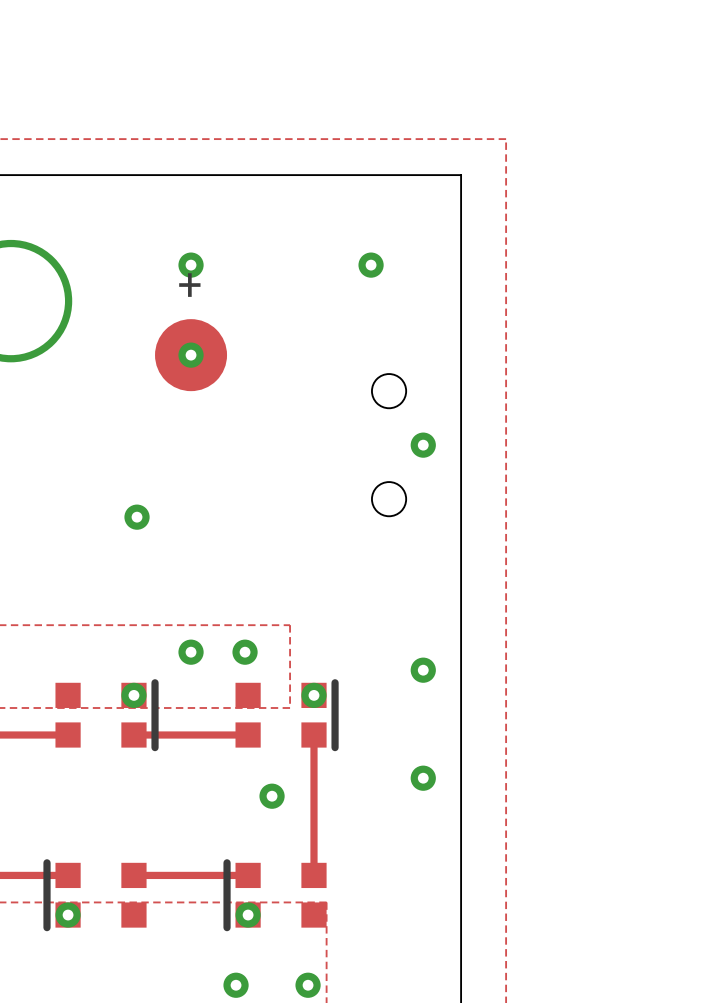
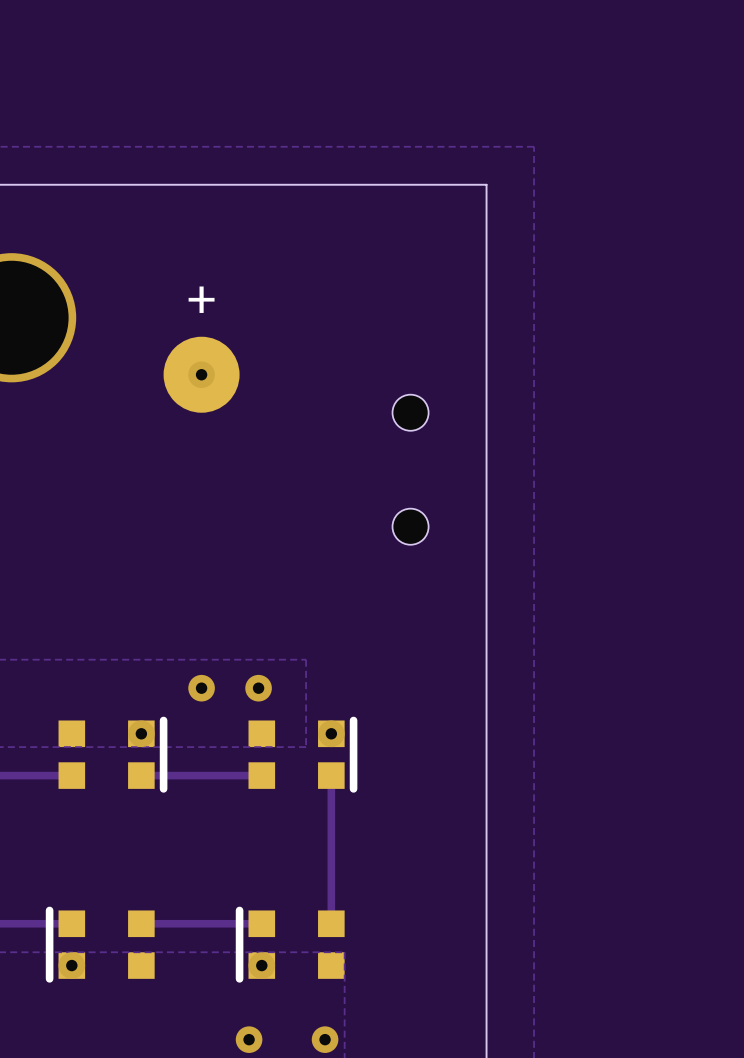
via: (191, 265) -> none
via: (371, 265) -> none
via: (423, 445) -> none
via: (137, 517) -> none
via: (423, 670) -> none
via: (423, 778) -> none
via: (272, 796) -> none

